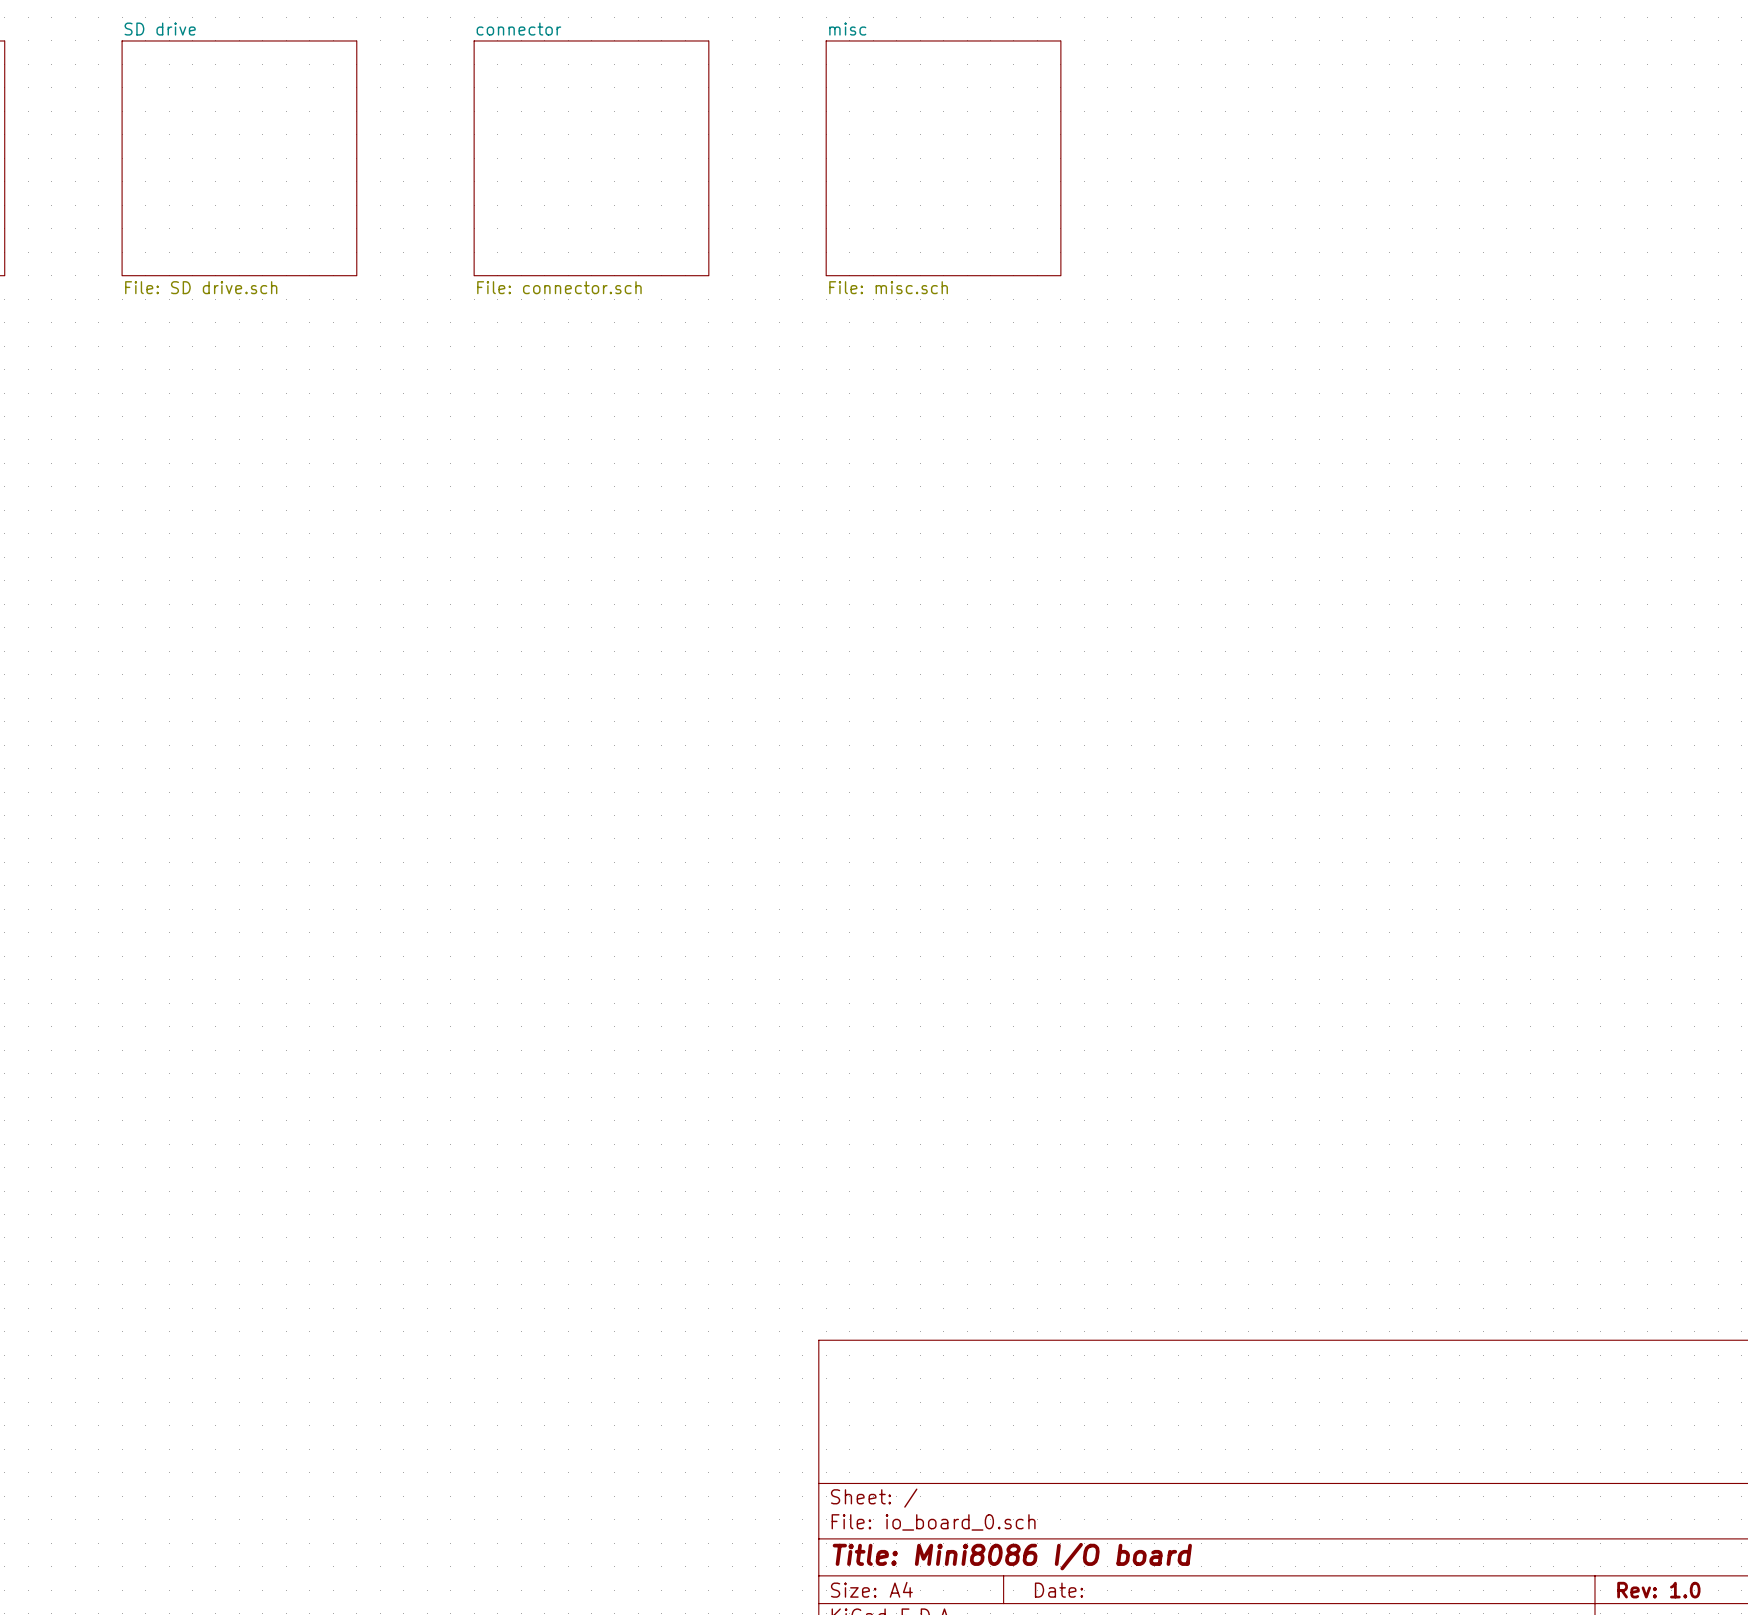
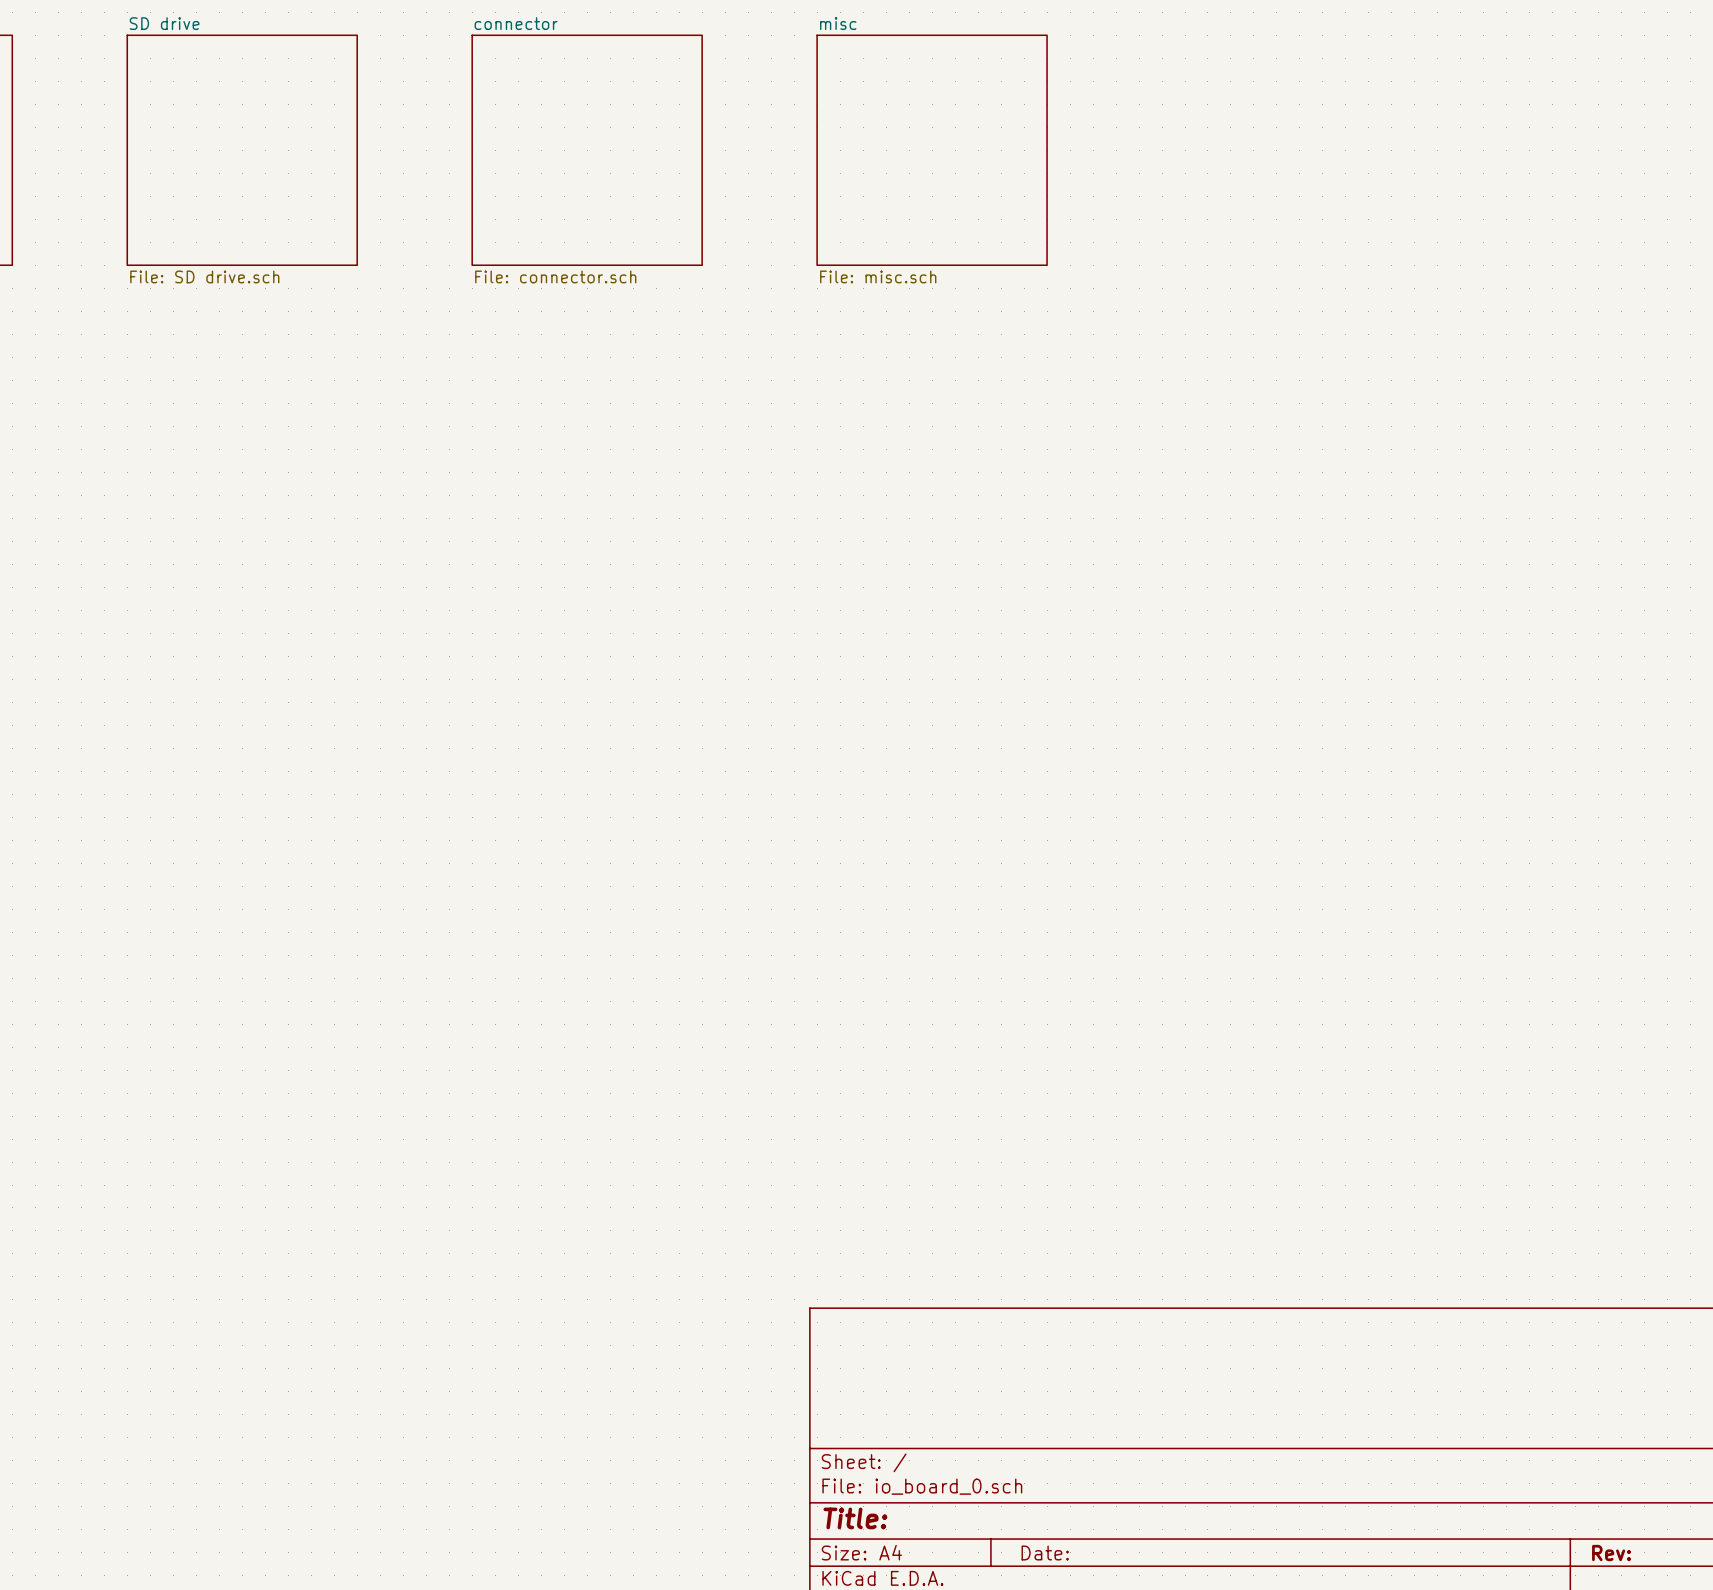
title block: Title: Mini8086 I/O board (1012, 1556) -> Title: (855, 1518)
title block: Rev: 1.0 (1658, 1590) -> Rev: (1611, 1553)

